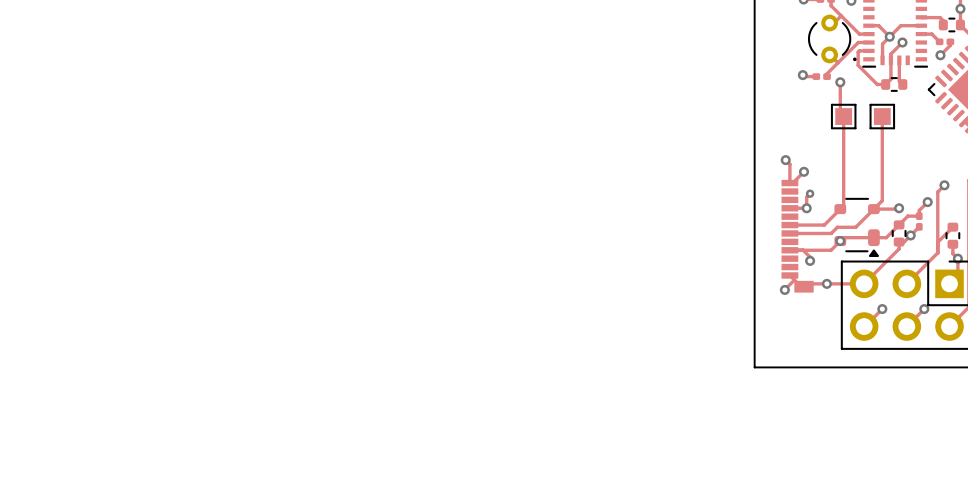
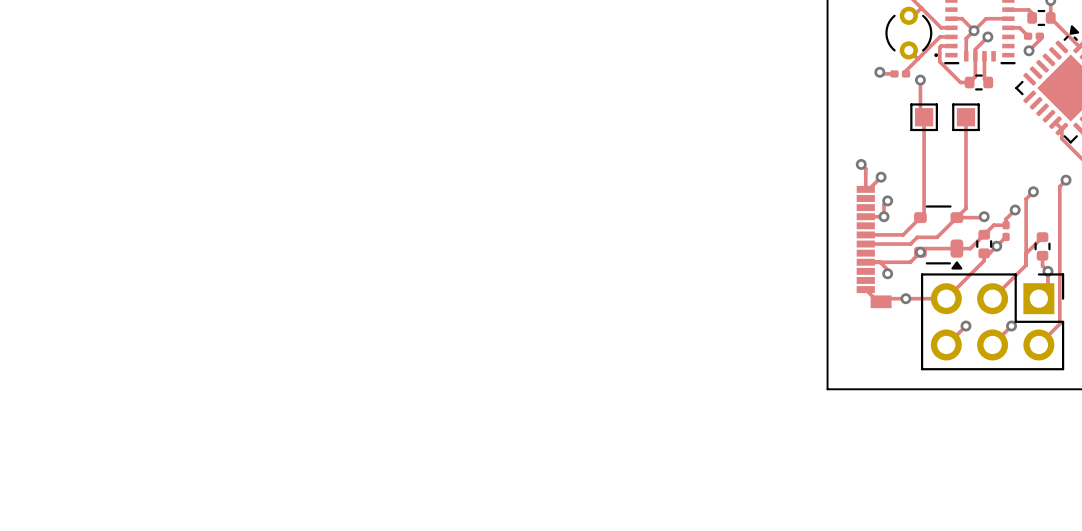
via: (810, 193) -> none
track: (794, 280) (784, 289) -> none
via position: (784, 289) -> (887, 200)

